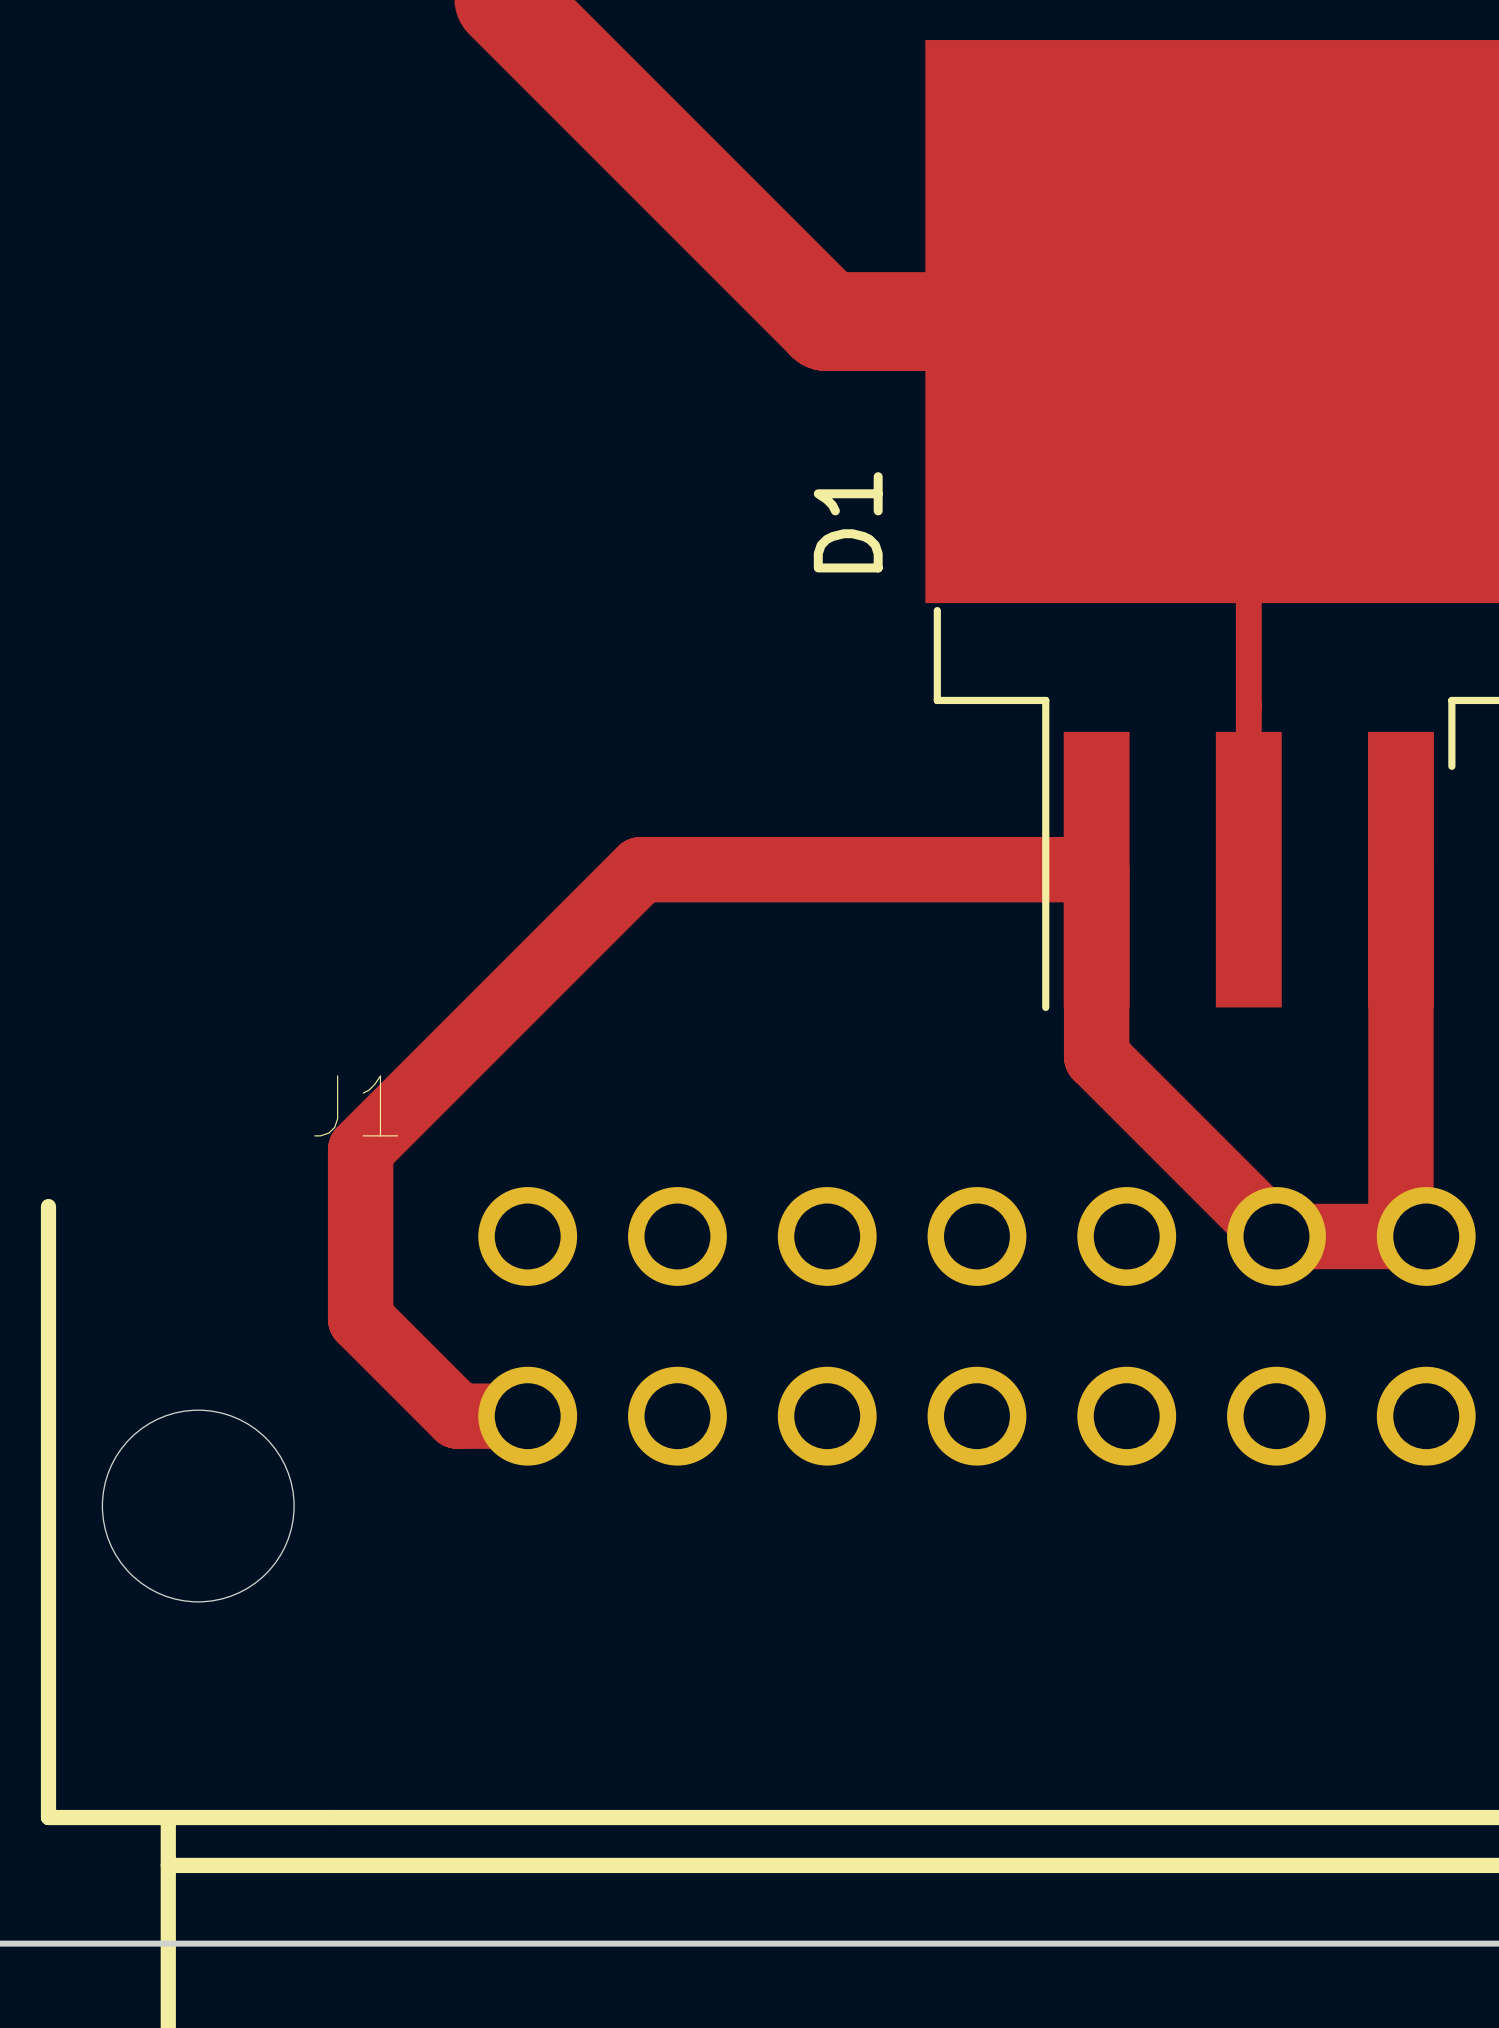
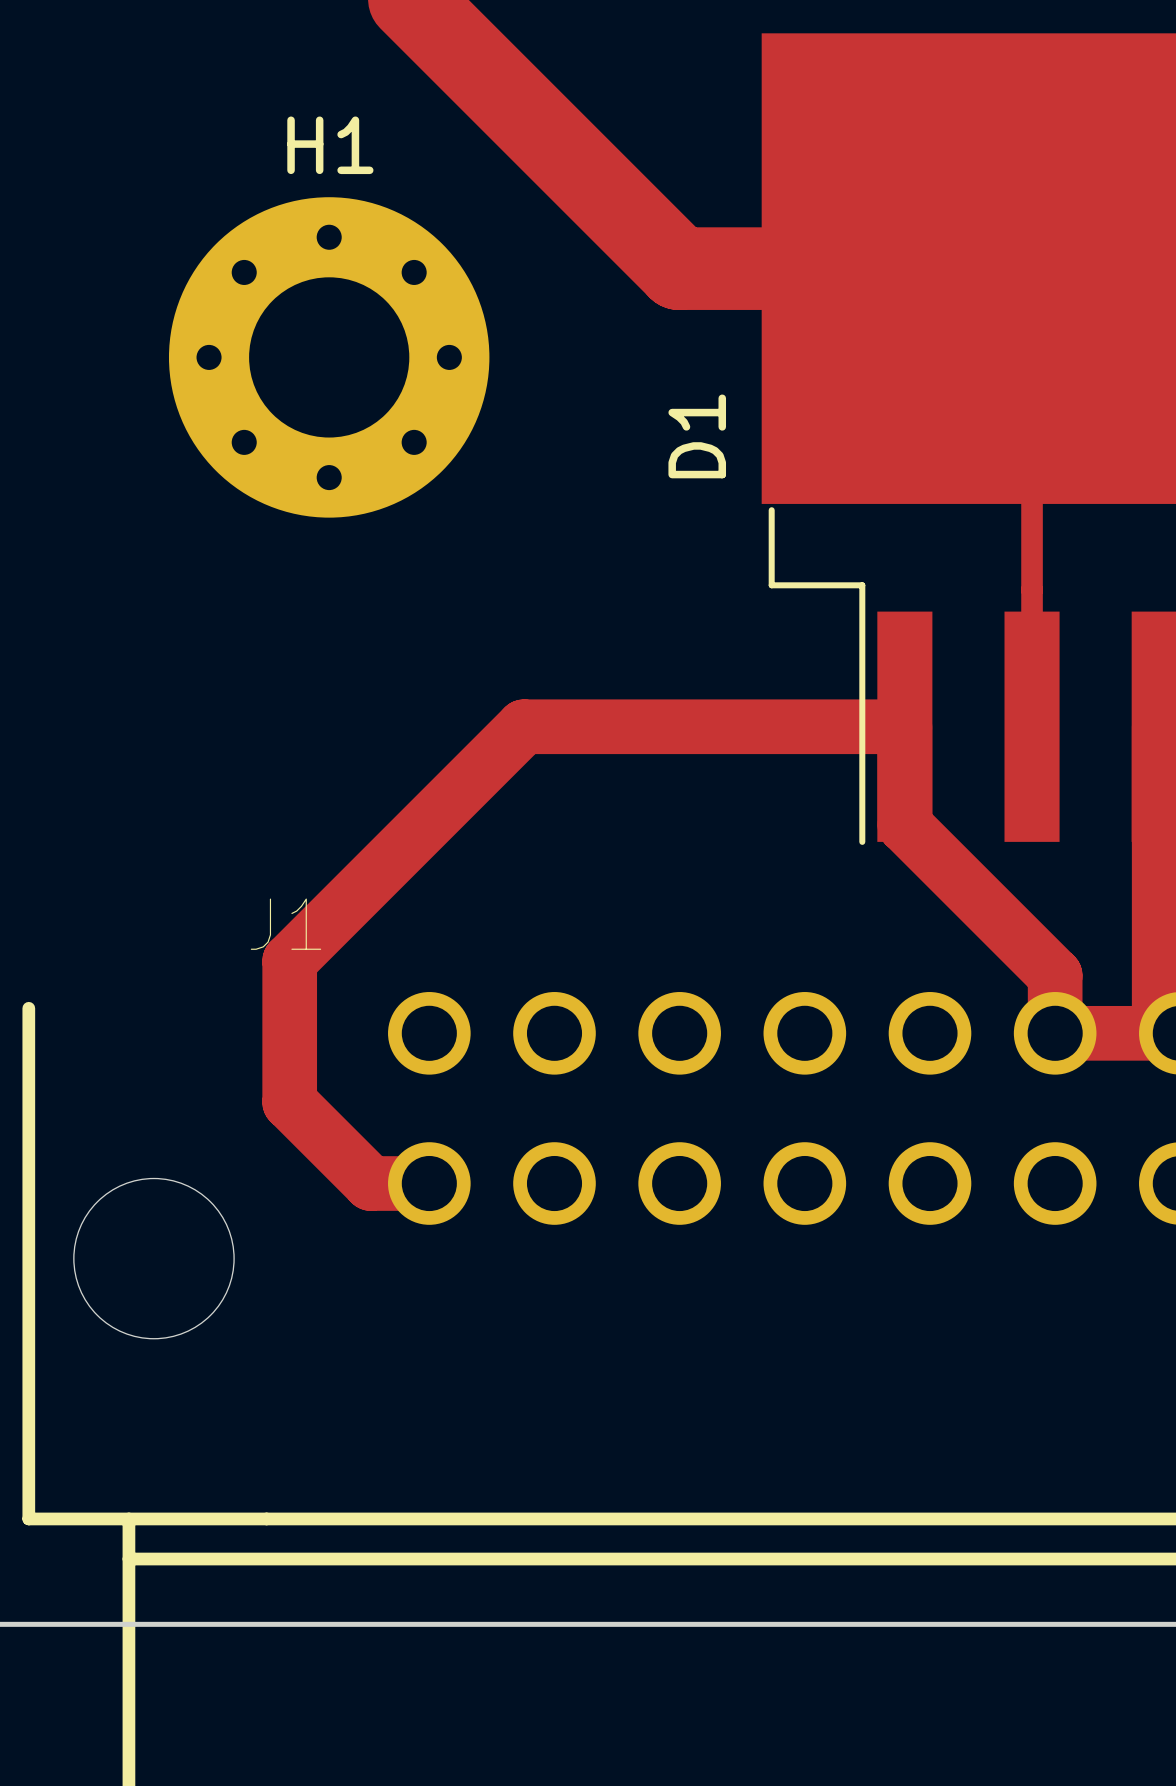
H1: none -> (329, 357)
track: (1096, 987) (1096, 1056) (1276, 1236) -> (904, 825) (1055, 975) (1055, 1033)

